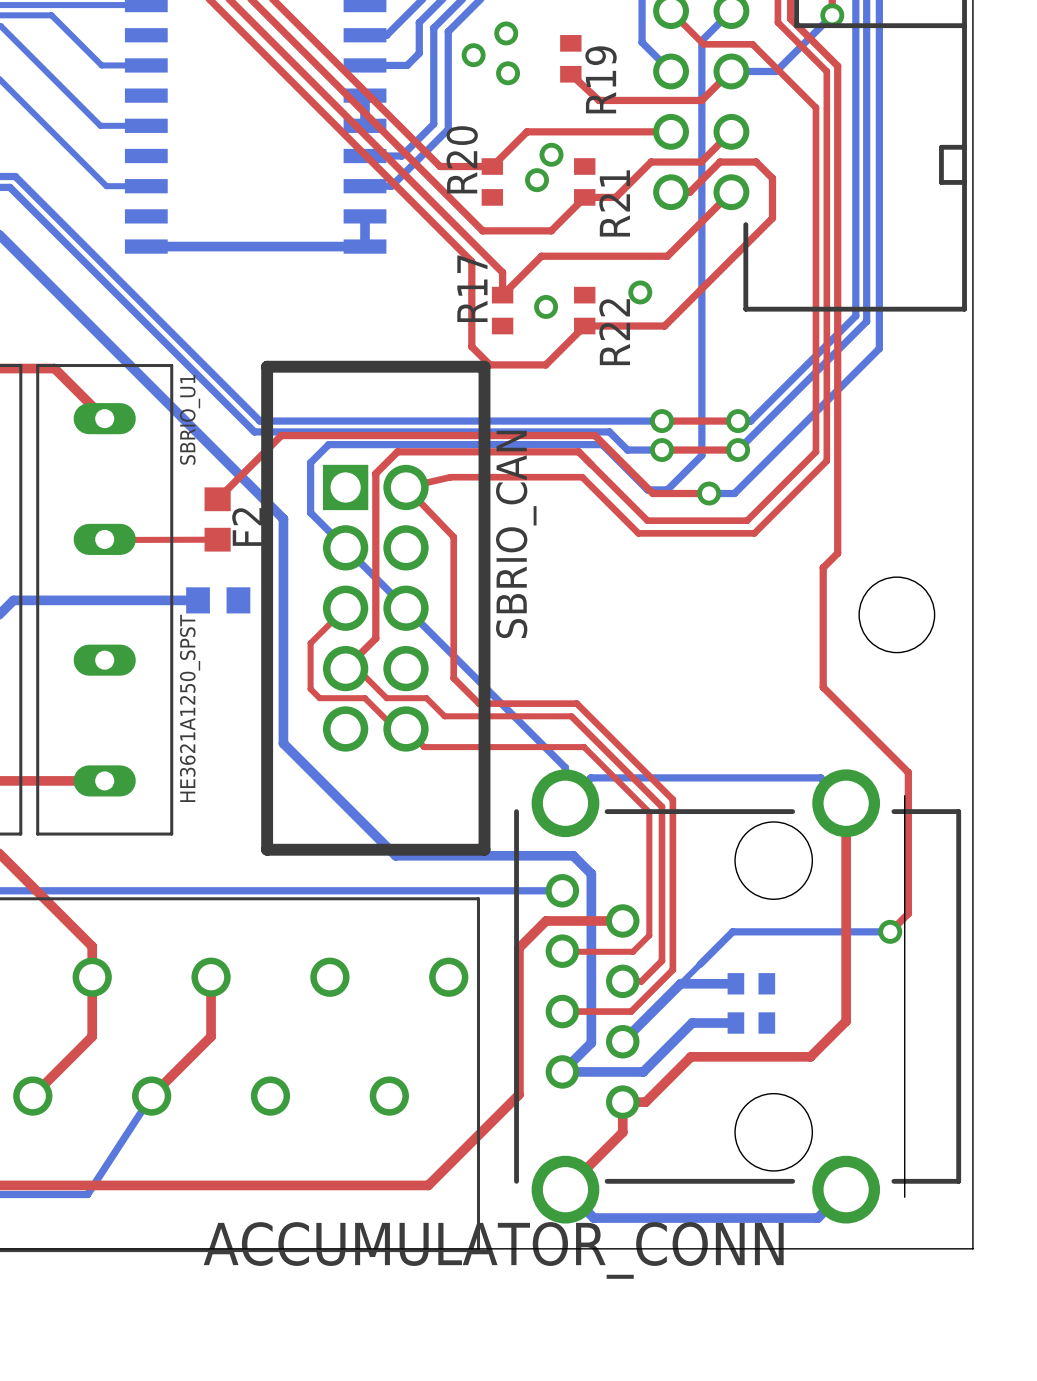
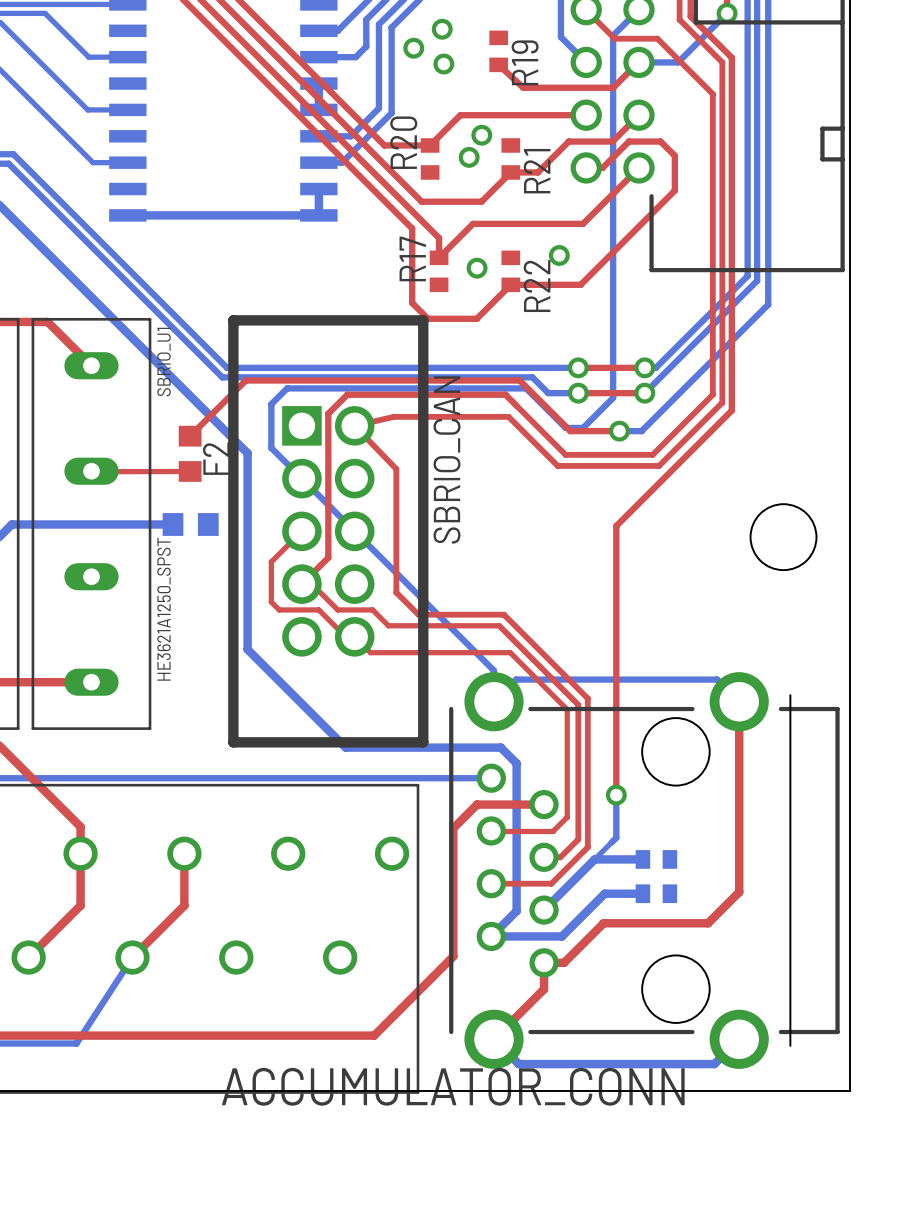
top track: (837, 469) (837, 553) (823, 567) (823, 687) (908, 772) (908, 913) (890, 931) -> (731, 410) (616, 526) (616, 795)
via: none -> (616, 795)
bottom track: (890, 931) (732, 931) (705, 959) -> (616, 795) (616, 837)
via: (890, 931) -> none

